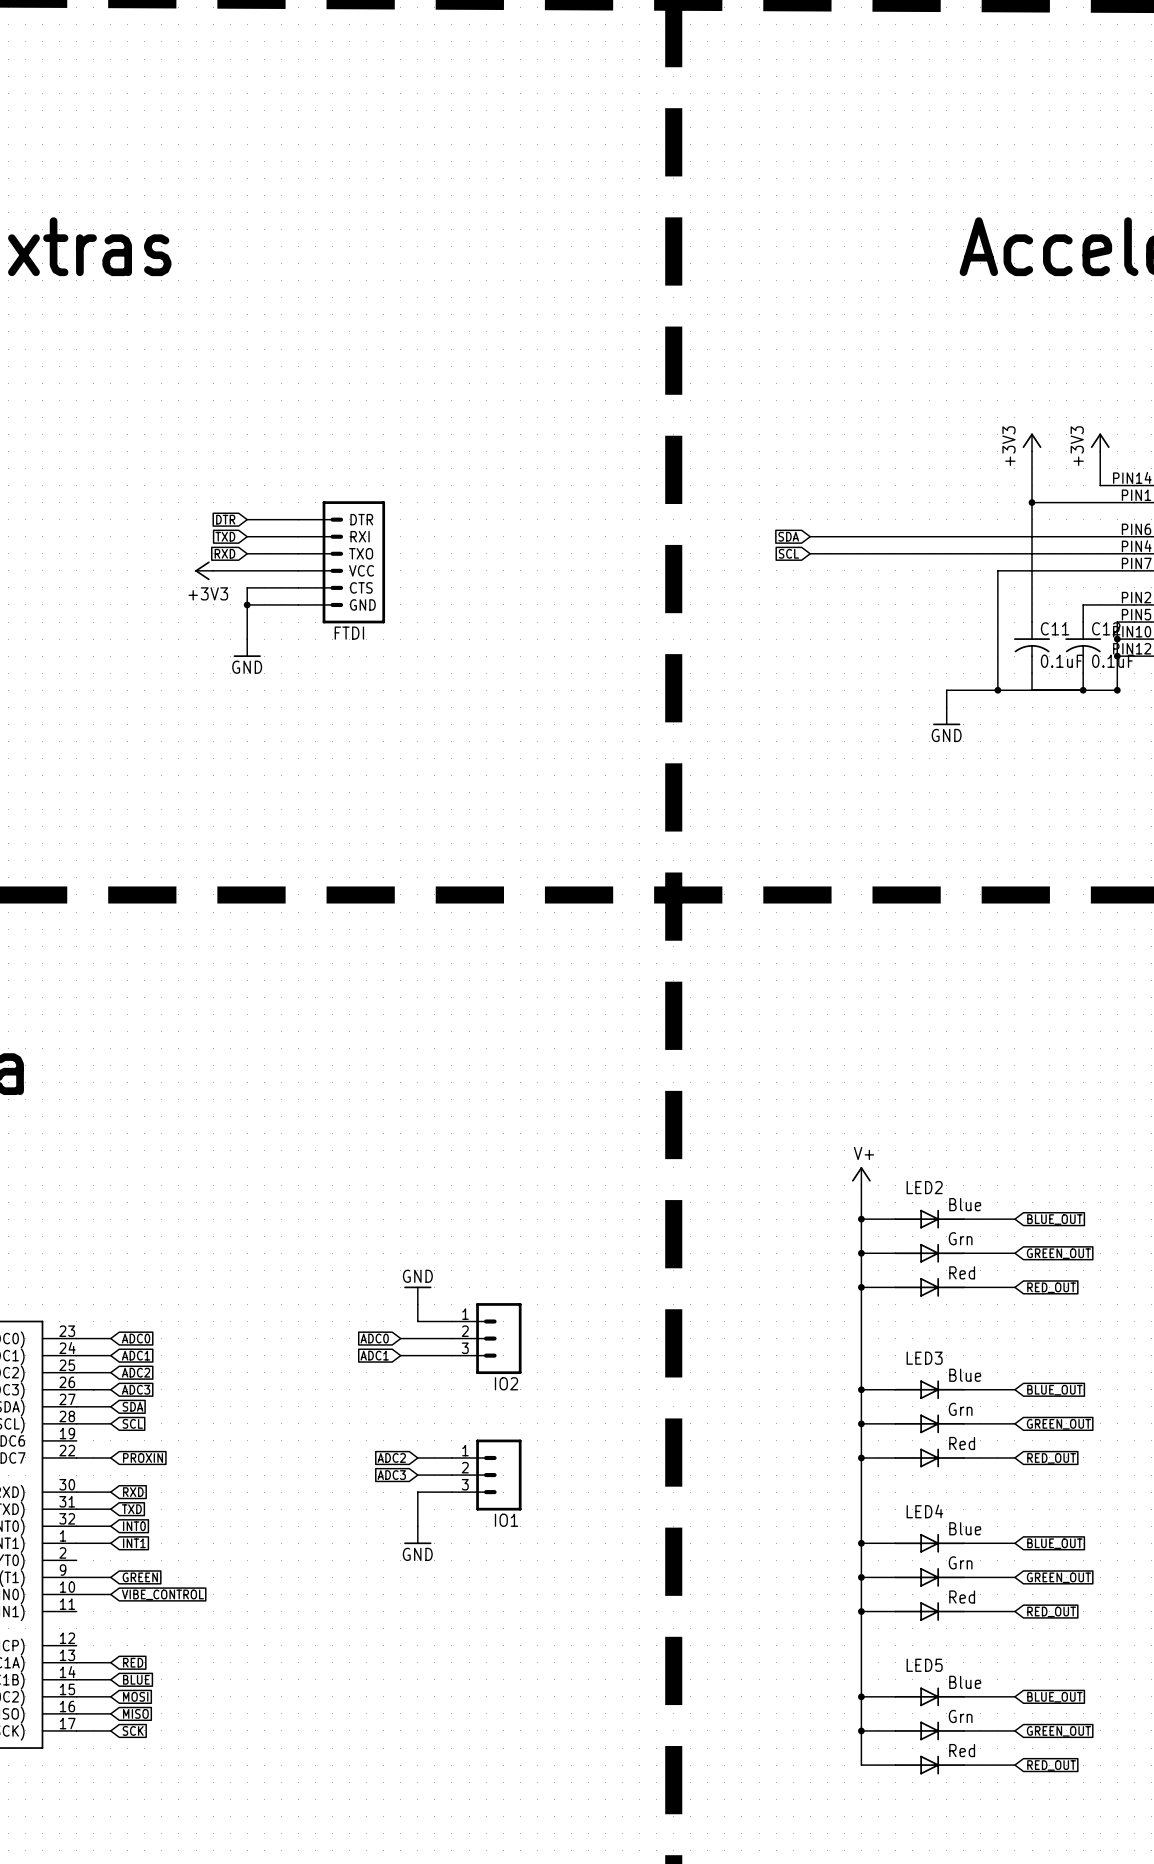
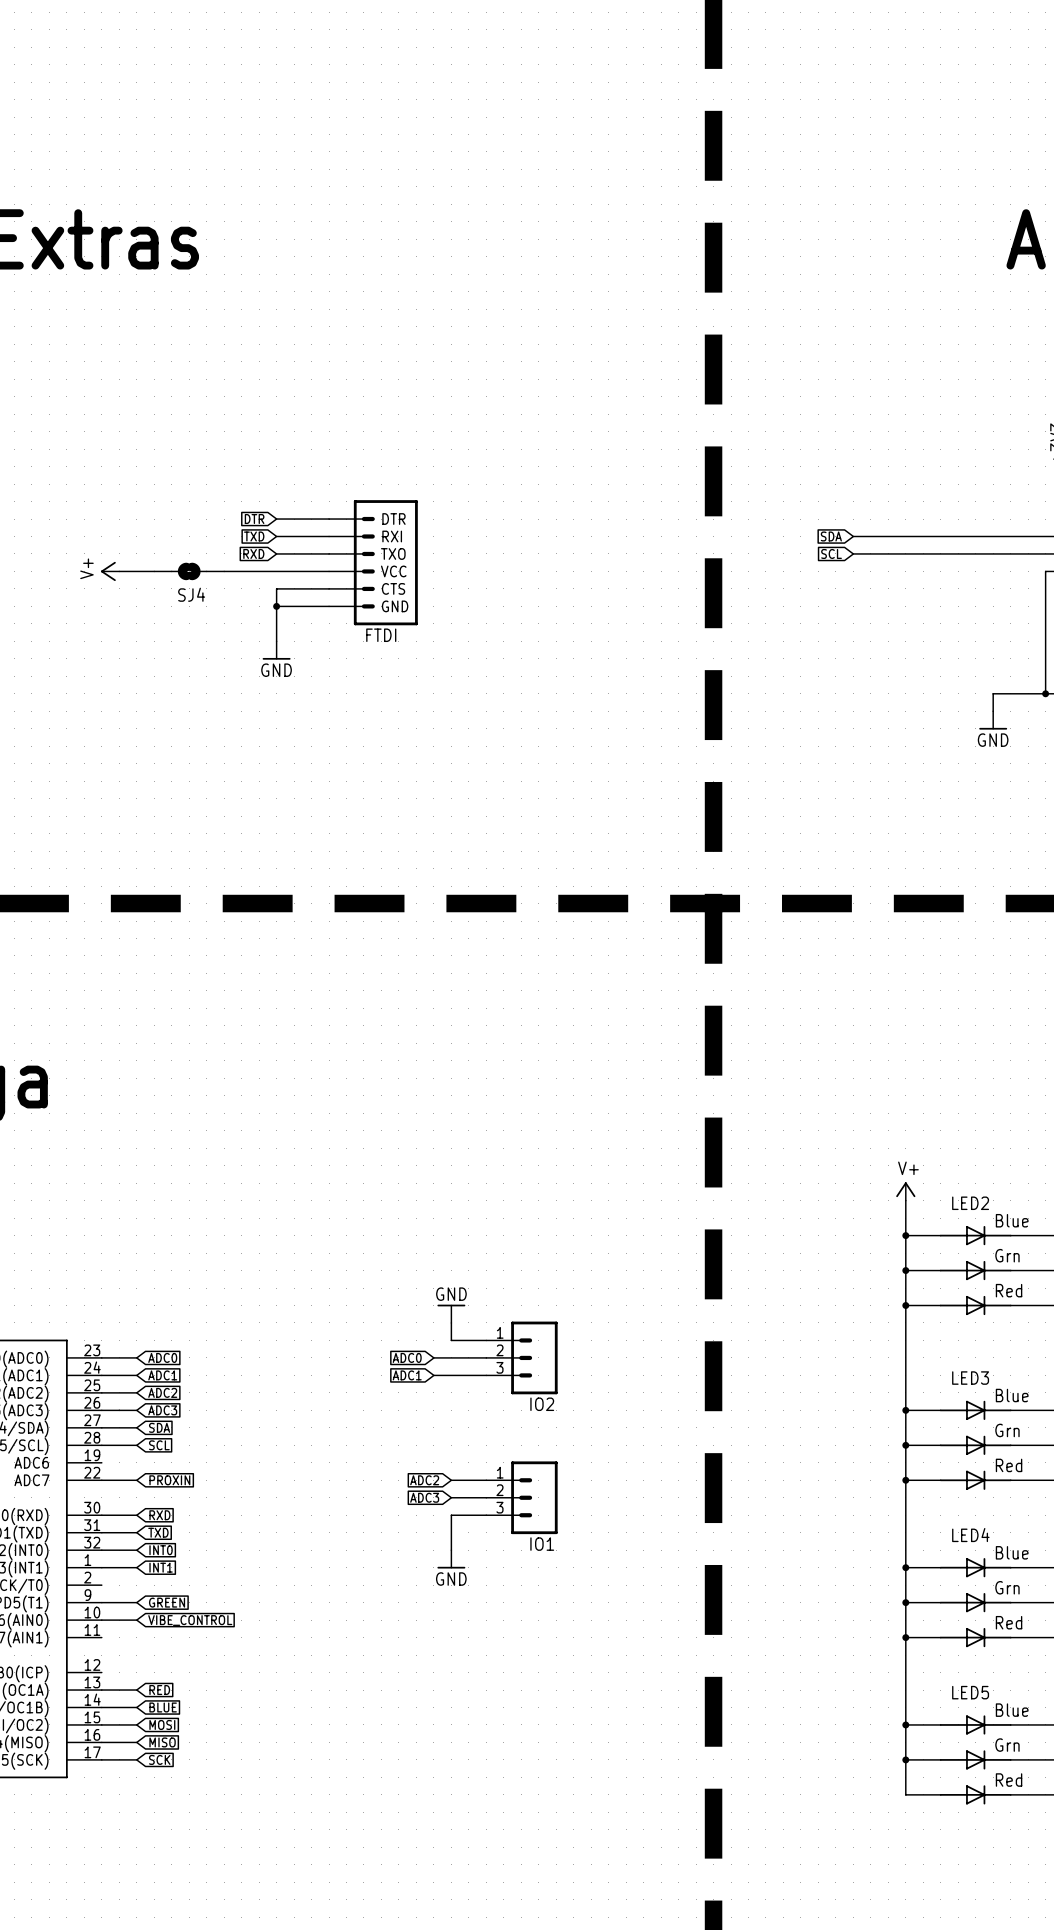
power symbol: none -> V+ (110, 571)
wire: none -> (119, 571) (154, 571)
SJ4: none -> (189, 571)
power symbol: +3V3 (204, 570) -> none

